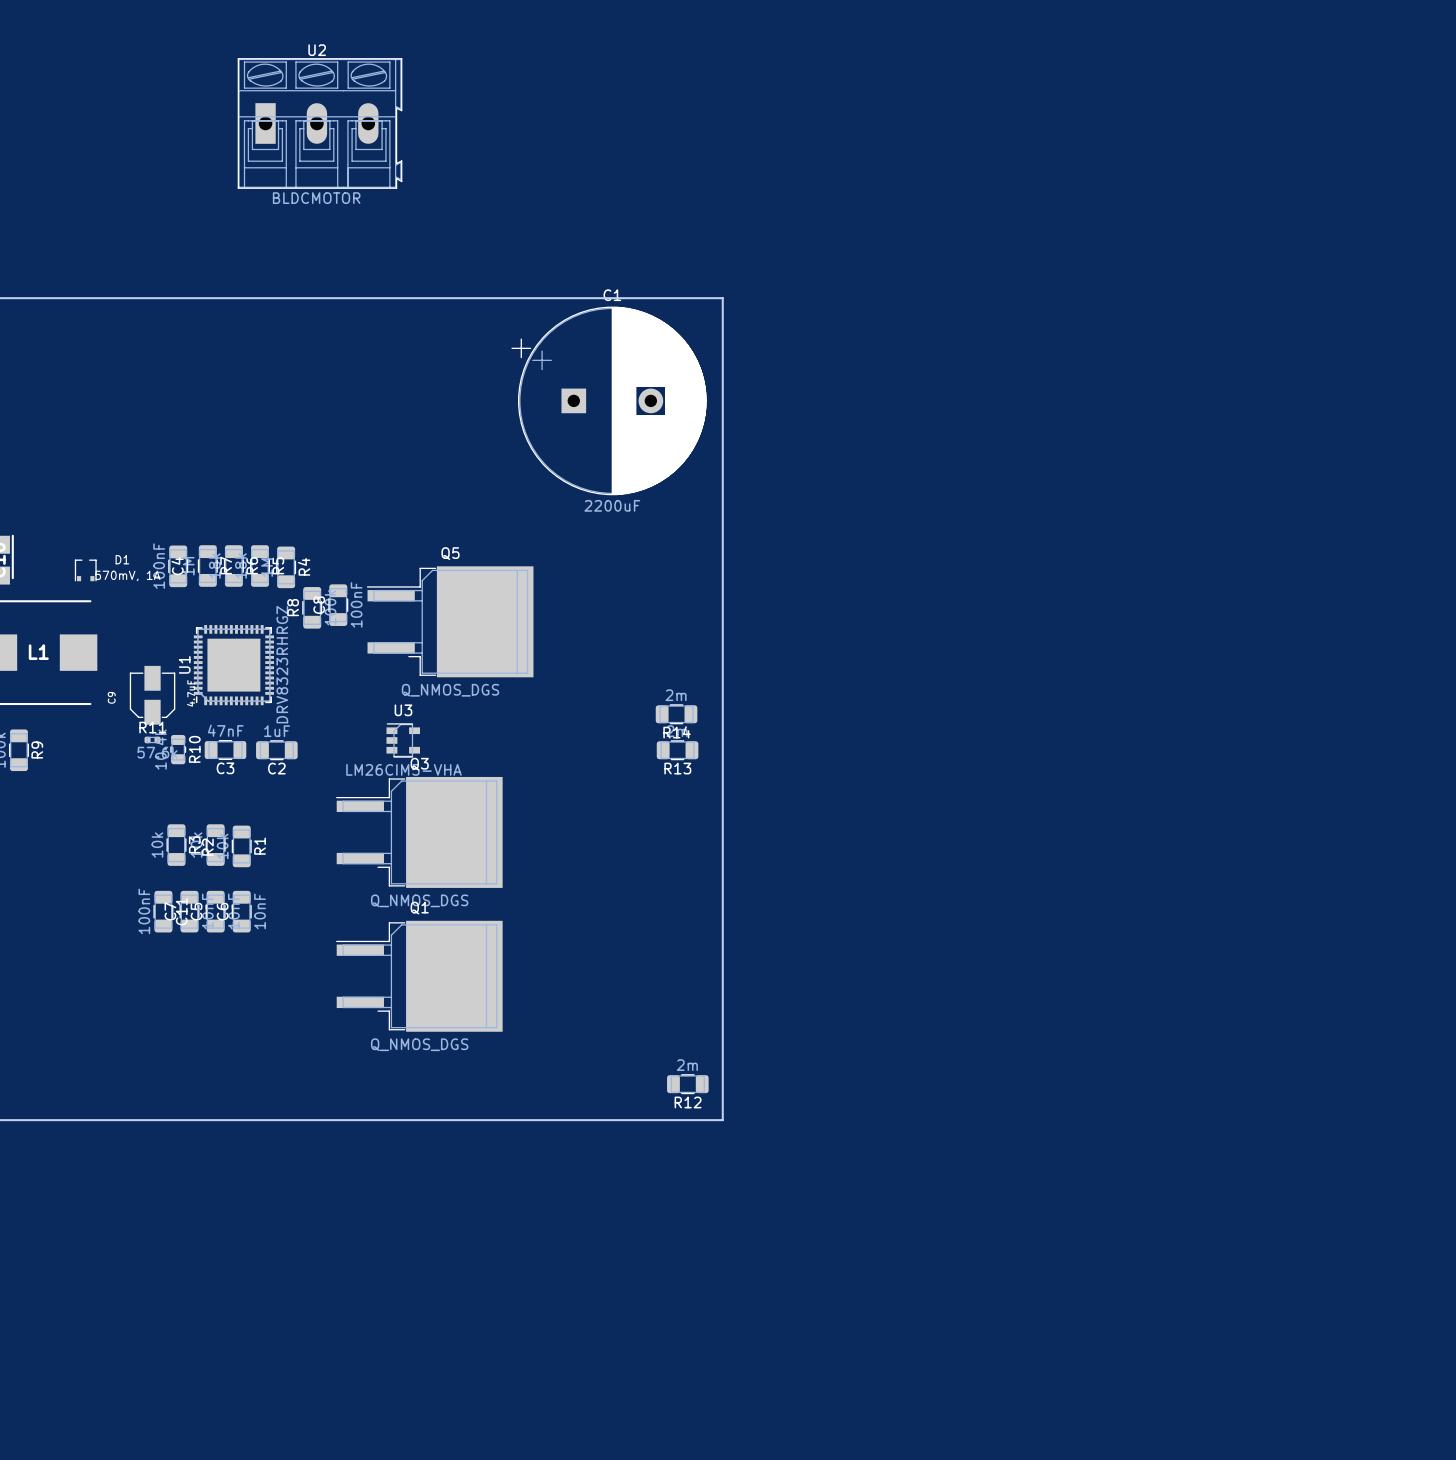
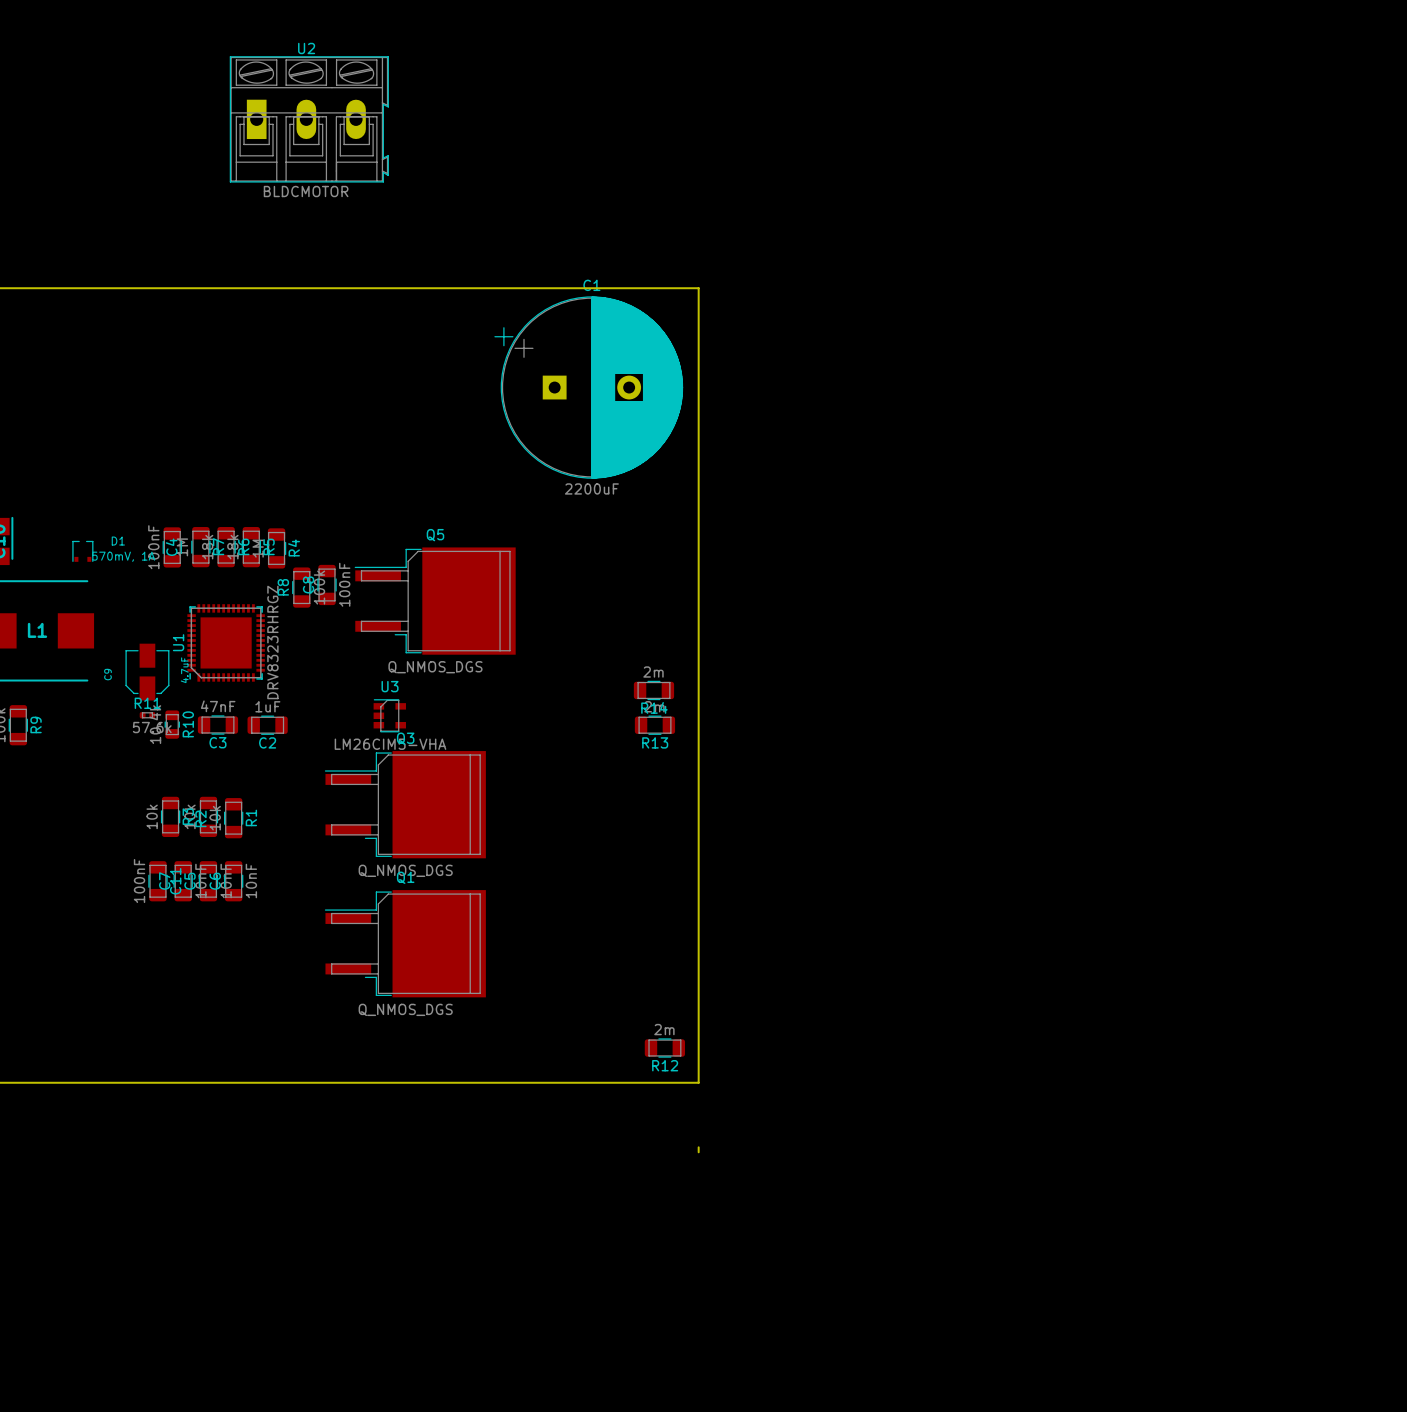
board edge: none -> (698, 1147) (698, 1152)

